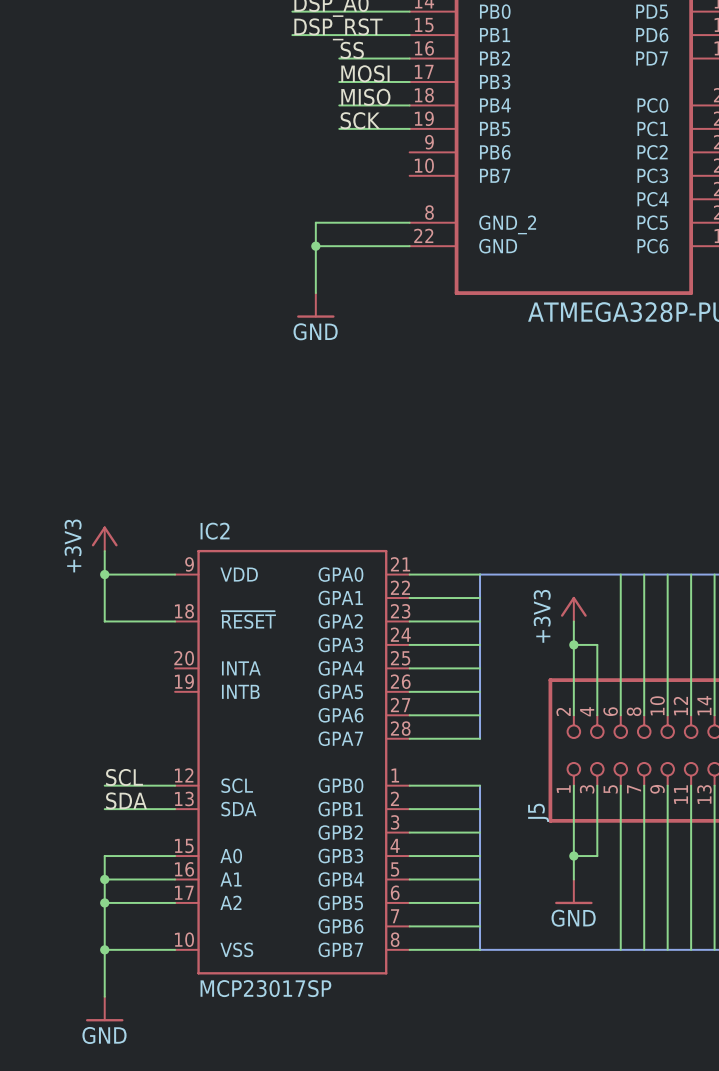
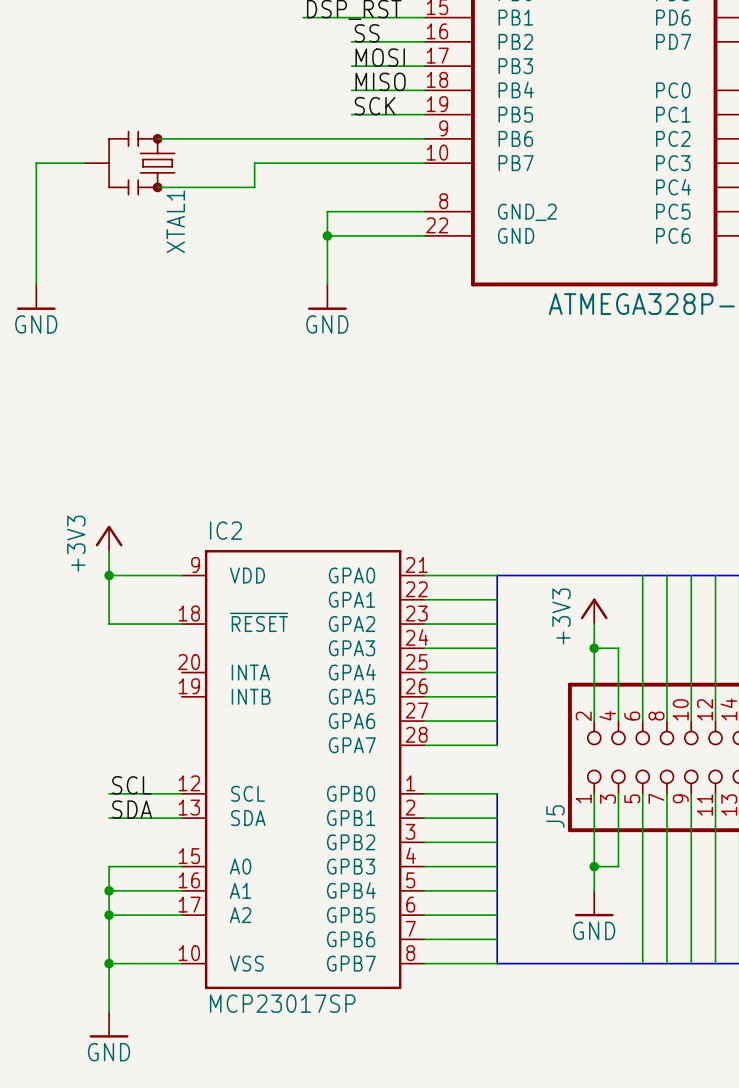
wire: none -> (157, 138) (424, 138)
wire: none -> (84, 163) (36, 163) (36, 284)
XTAL1: none -> (129, 163)
wire: none -> (424, 163) (254, 163) (254, 187) (157, 187)
power symbol: none -> GND (36, 297)

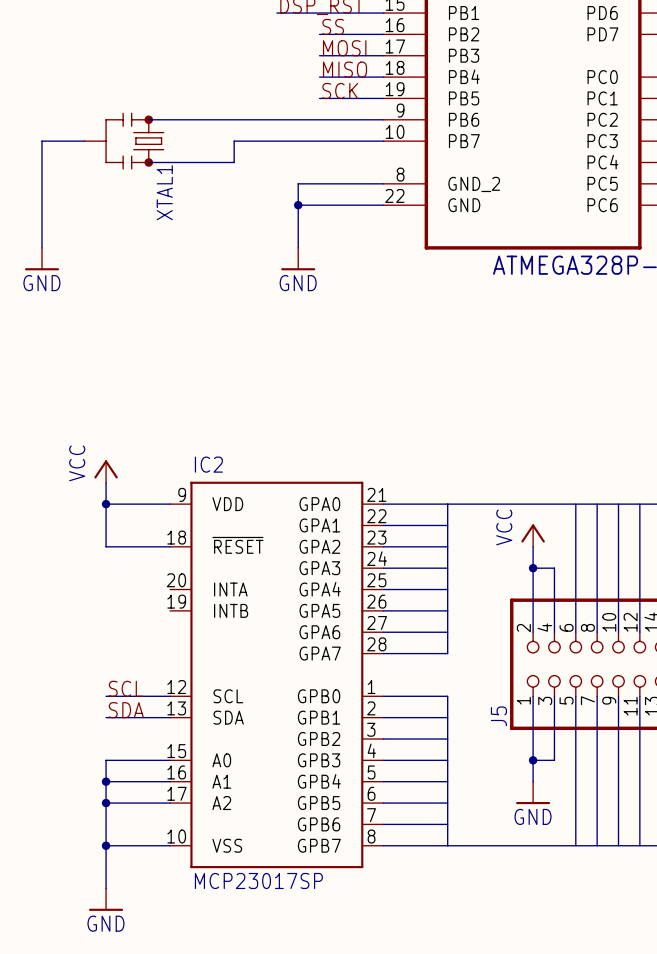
power symbol: +3V3 (109, 538) -> VCC (106, 471)
power symbol: +3V3 (594, 611) -> VCC (533, 535)

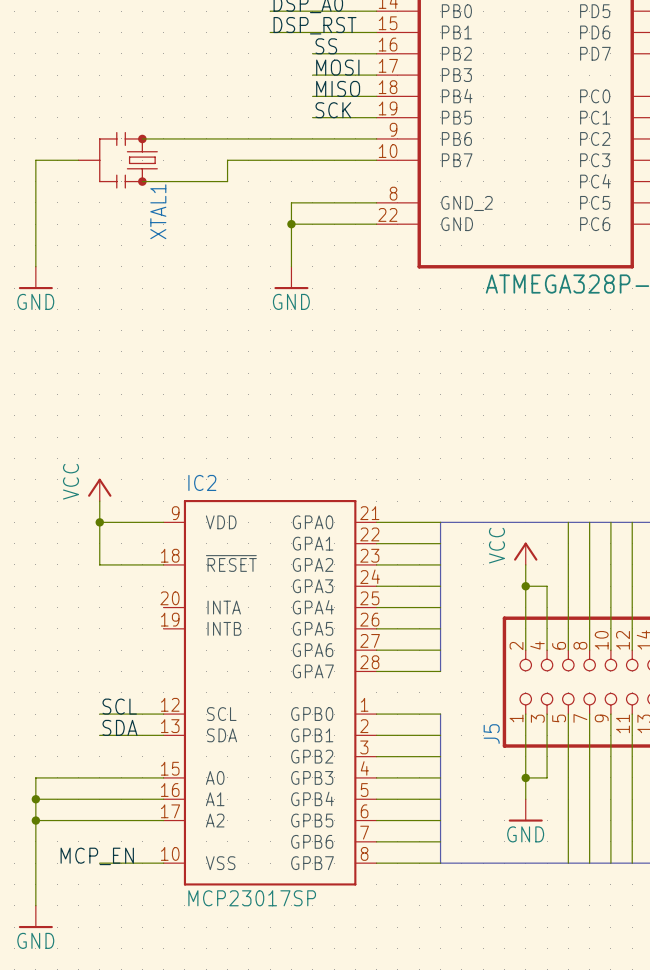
wire: (106, 760) (106, 888) -> (99, 777) (35, 777) (35, 905)
wire: none -> (35, 799) (99, 799)
junction: none -> (35, 799)
junction: (106, 781) -> none
wire: none -> (35, 820) (99, 820)
junction: none -> (35, 820)
junction: (106, 803) -> none
label: none -> MCP_EN (97, 856)
junction: (106, 845) -> none
power symbol position: GND (106, 899) -> GND (35, 916)

